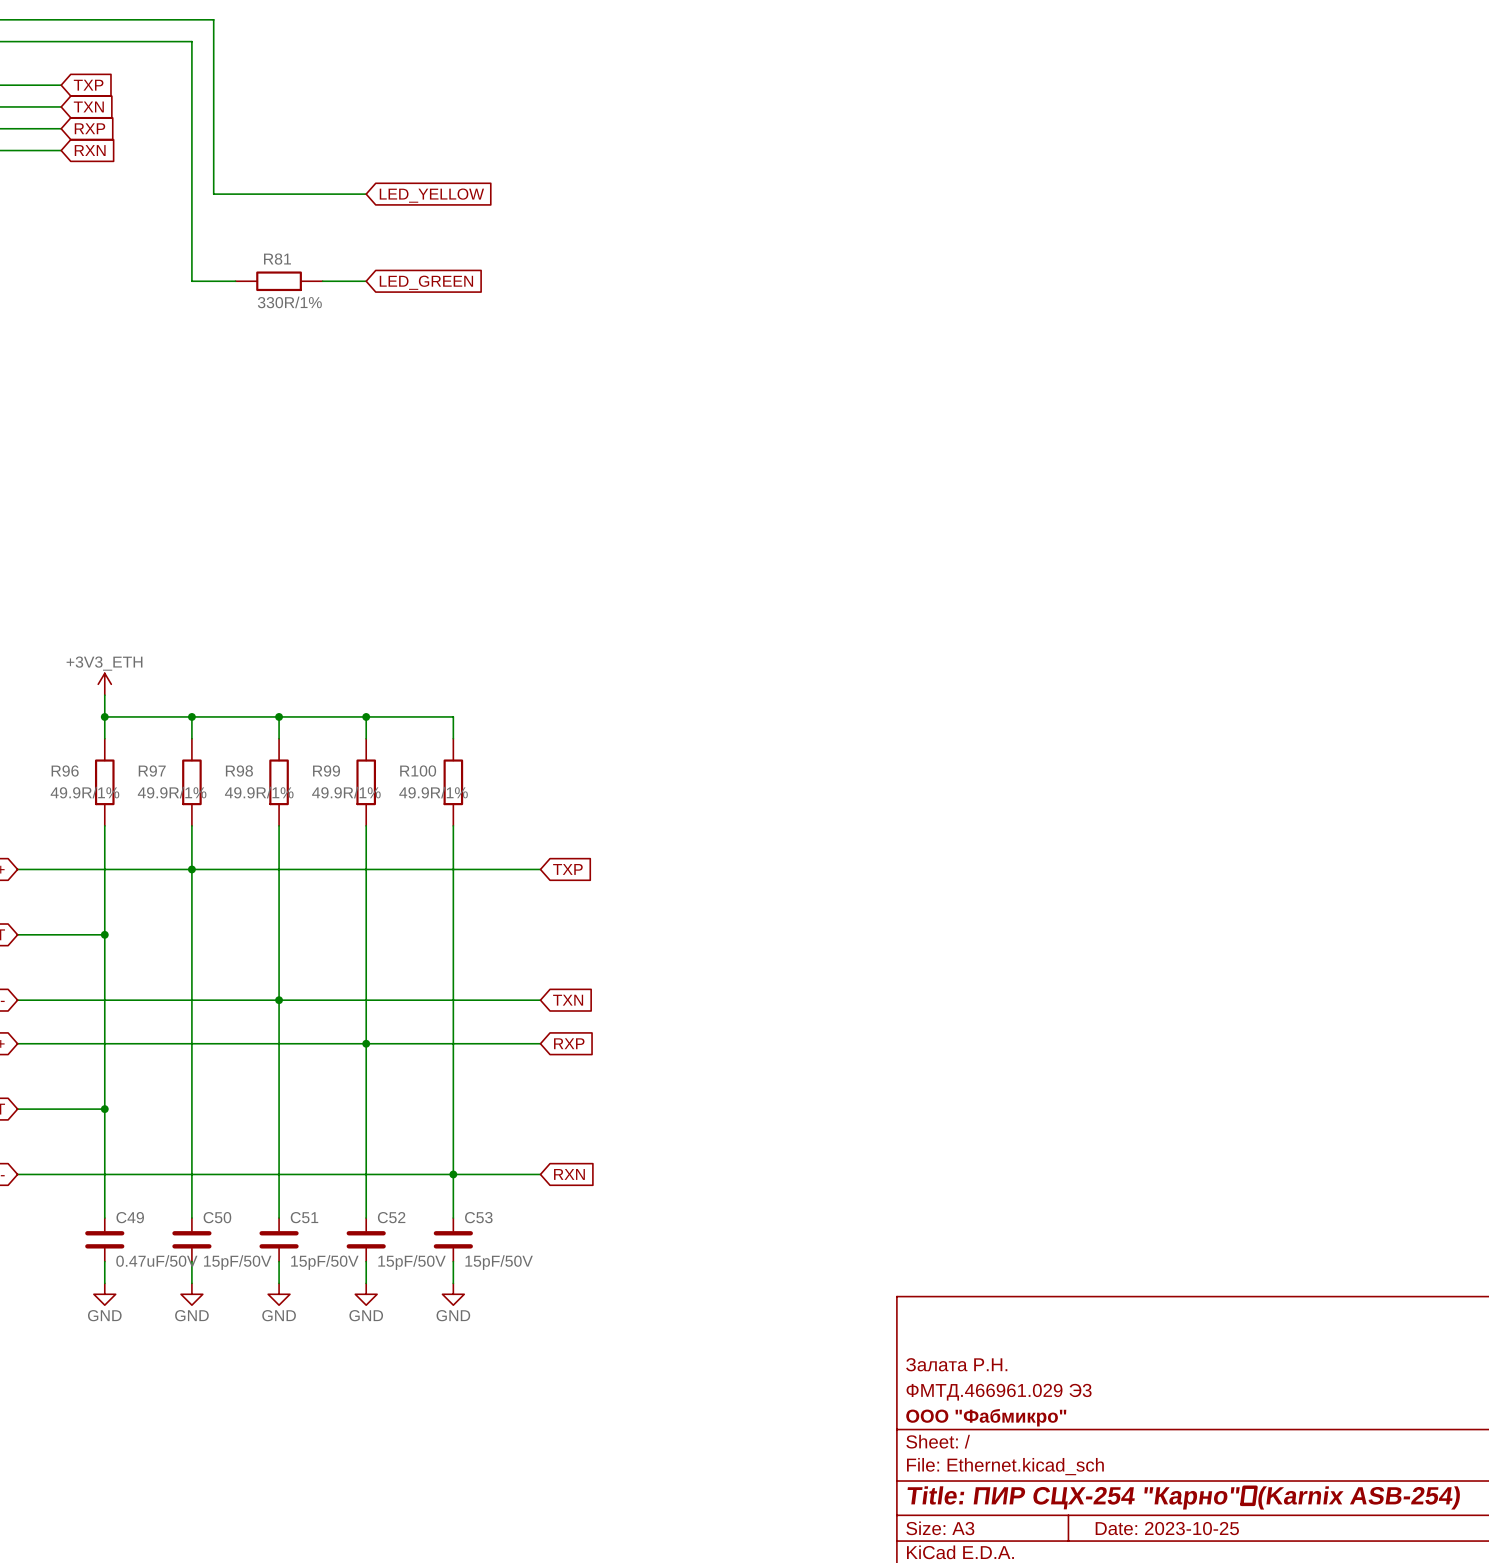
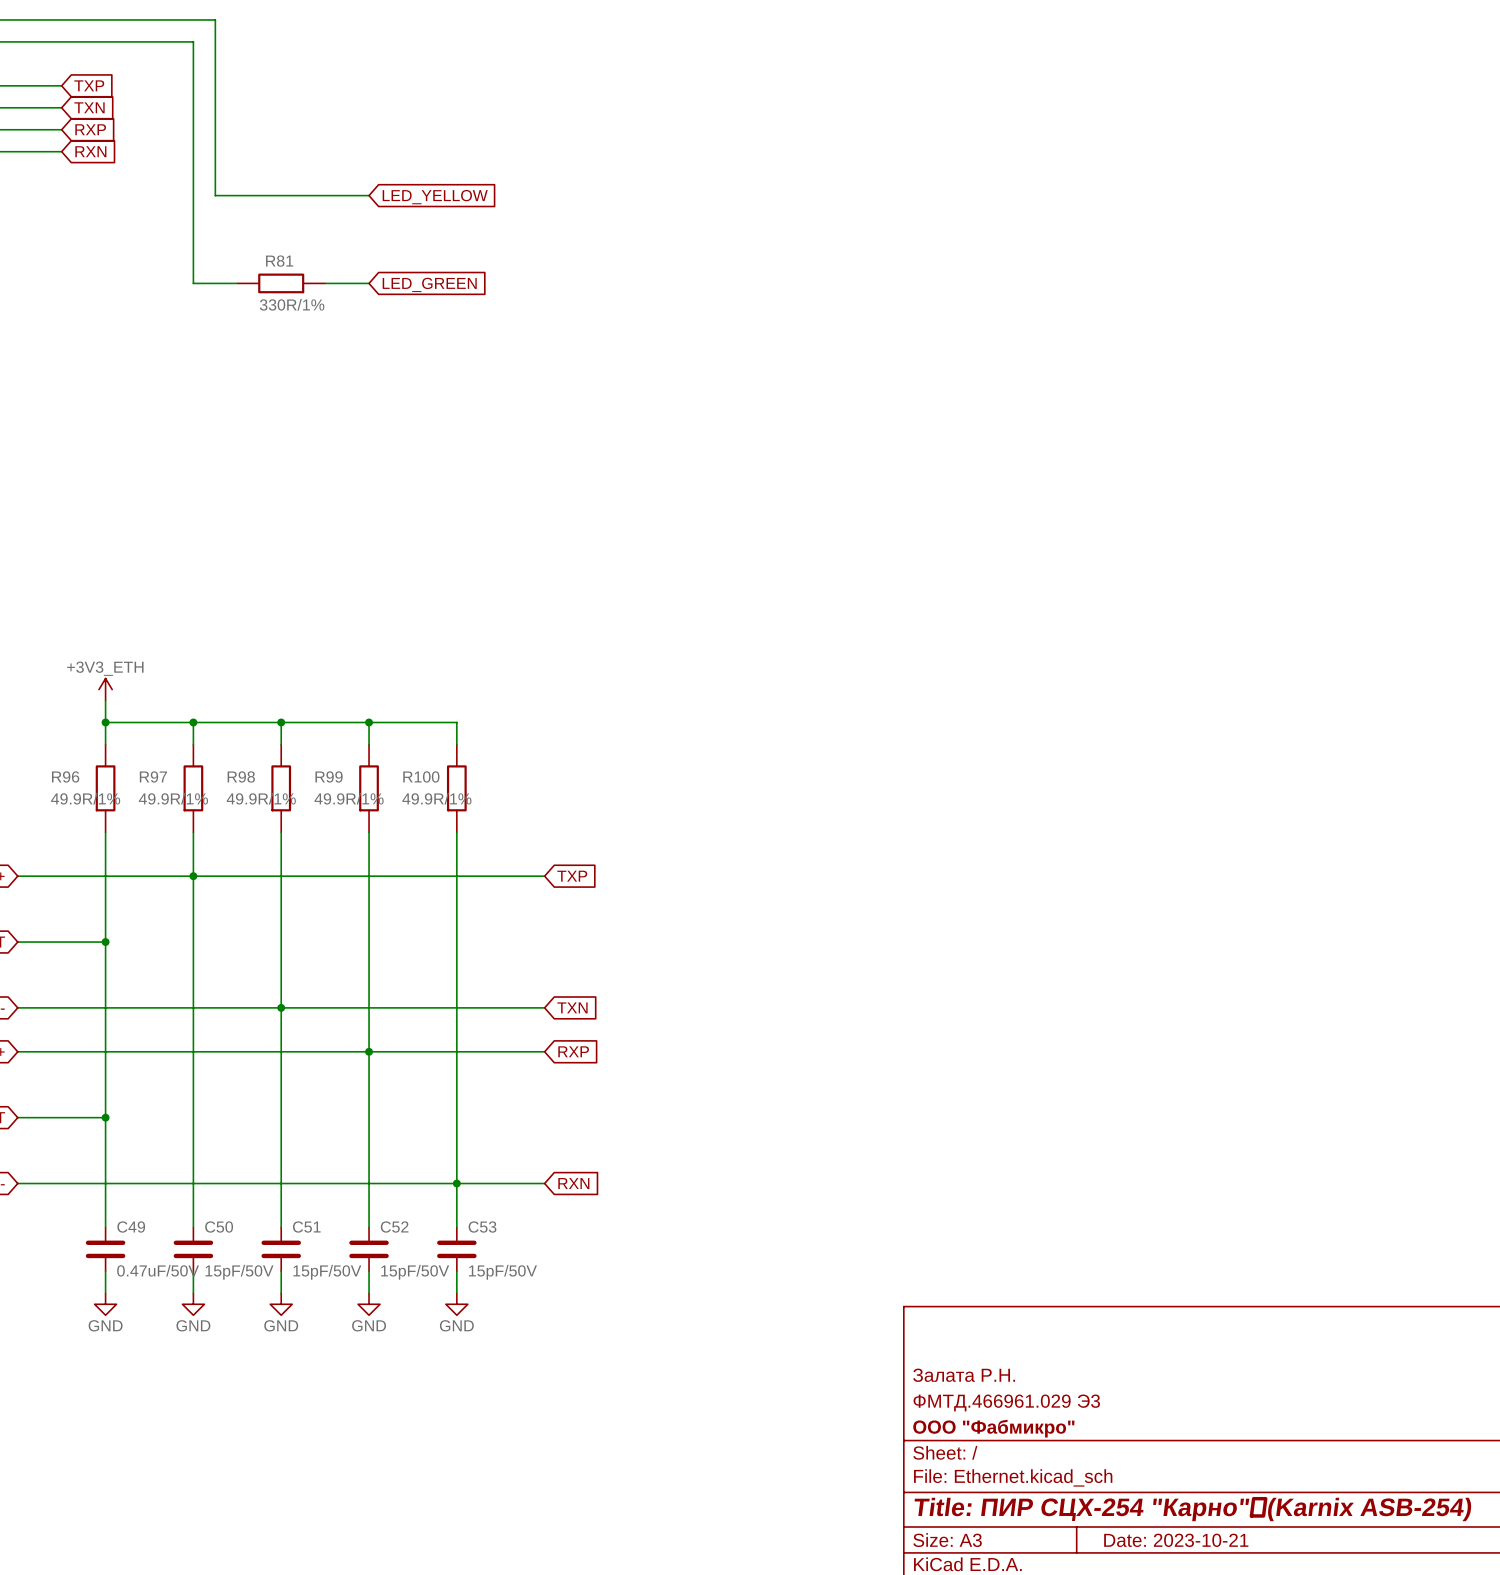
title block: Date: 2023-10-25 (1167, 1528) -> Date: 2023-10-21 (1176, 1540)

